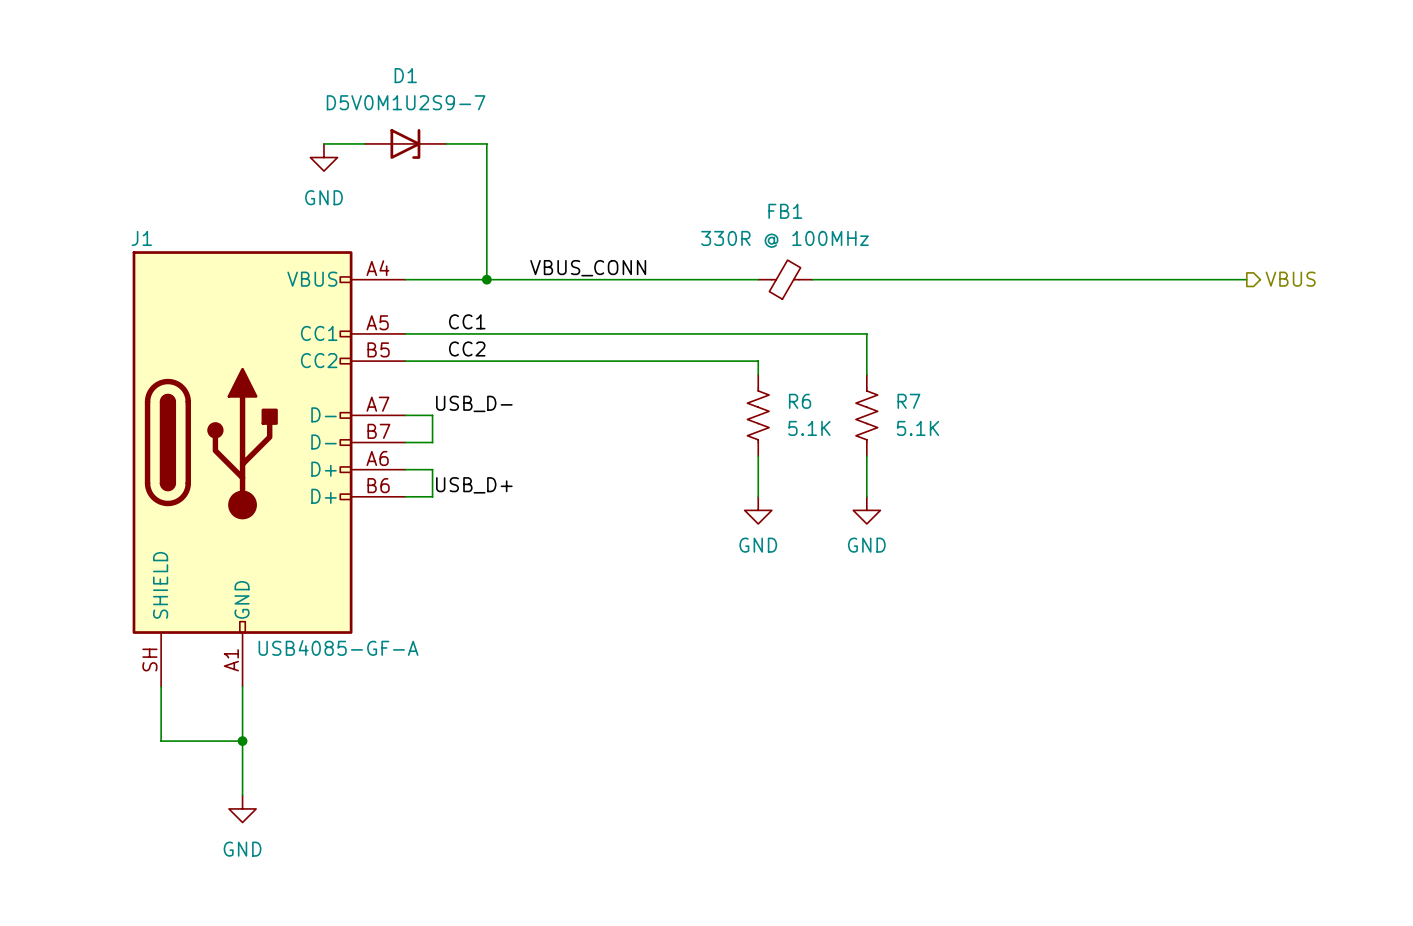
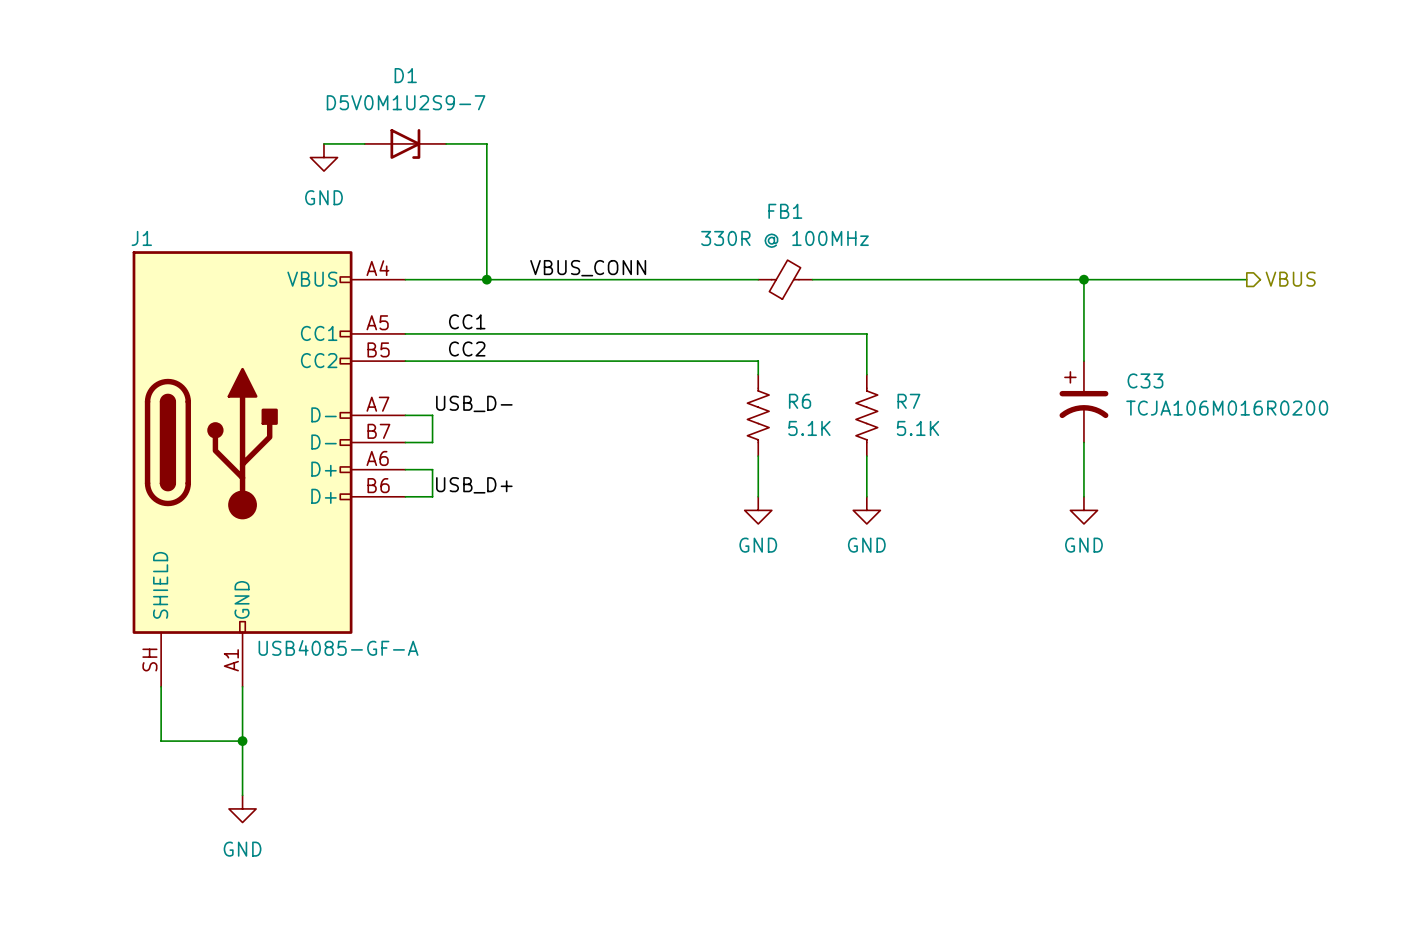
wire: none -> (1083, 279) (1083, 361)
junction: none -> (1083, 279)
C33: none -> TCJA106M016R0200 (1083, 401)
wire: none -> (1083, 442) (1083, 496)
power symbol: none -> GND (1083, 510)

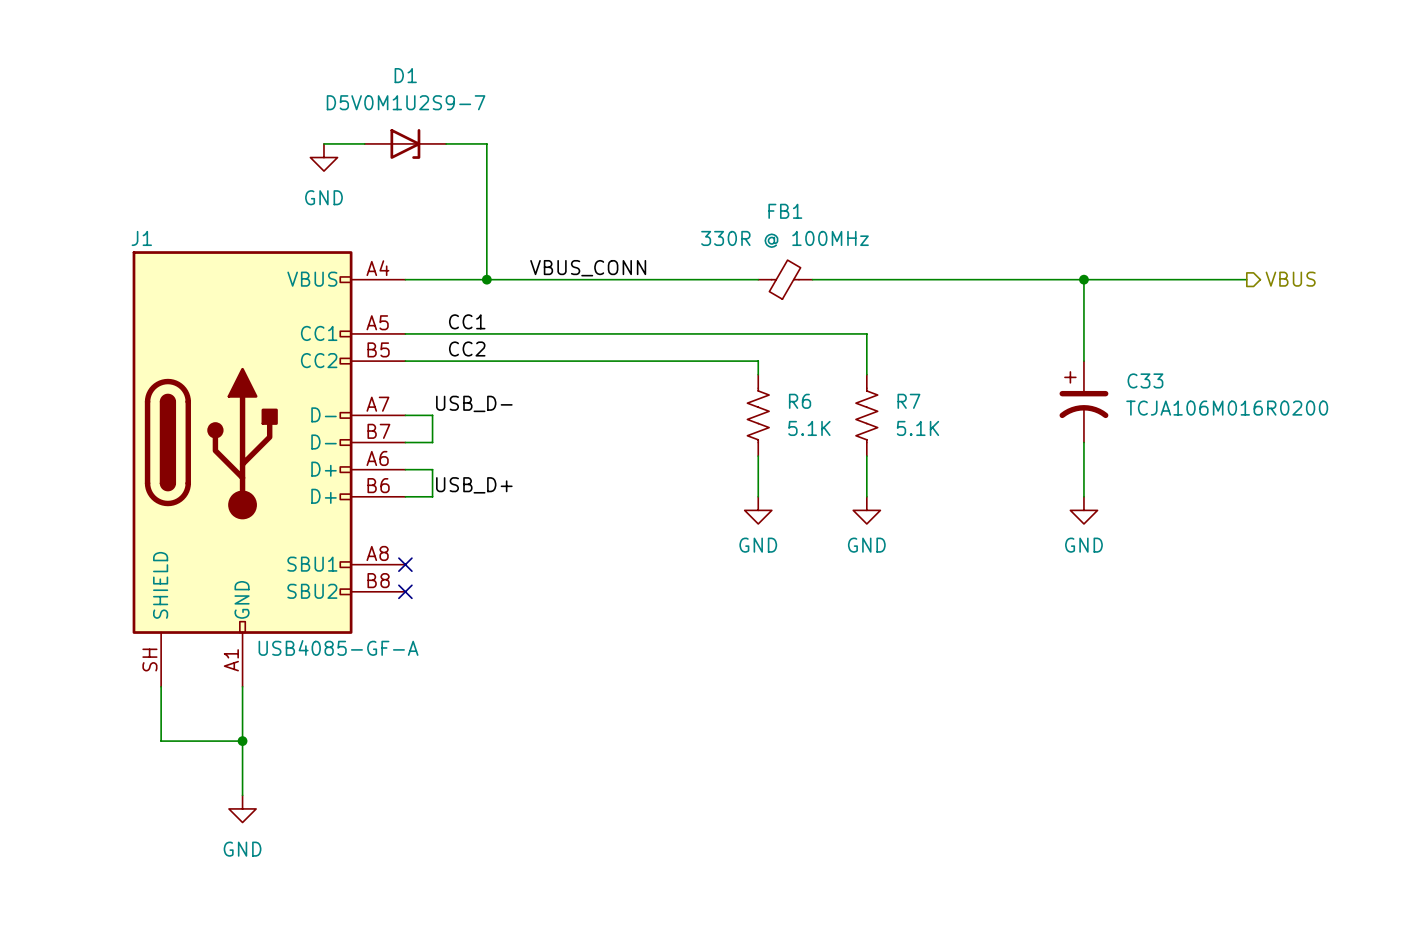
J1 symbol: [132, 251, 406, 687] -> [132, 251, 406, 687]
no-connect mark: none -> (405, 564)
no-connect mark: none -> (405, 591)

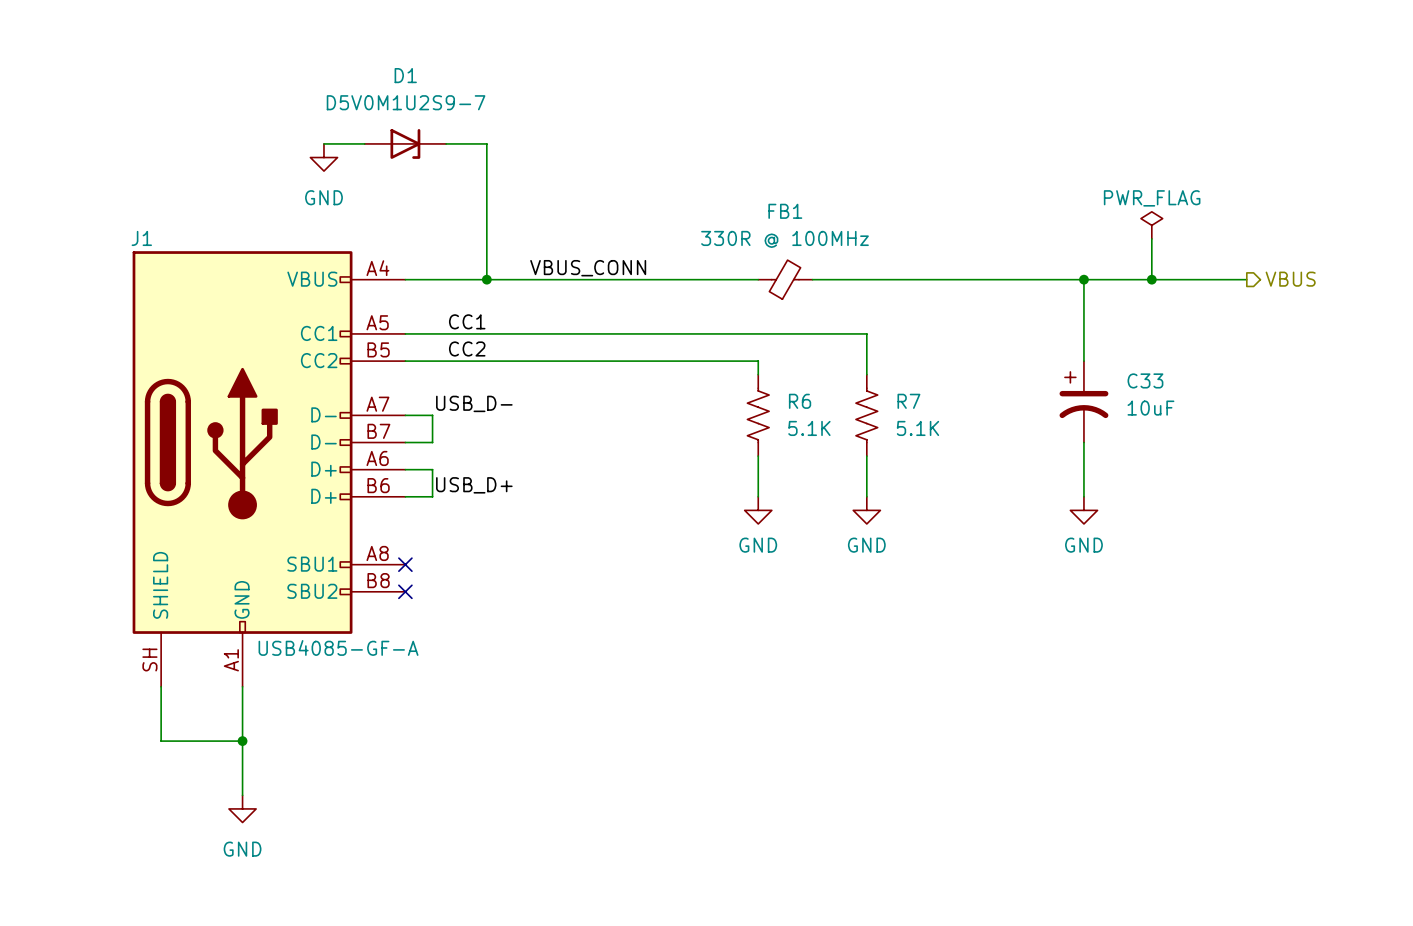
power symbol: none -> PWR_FLAG (1151, 225)
wire: none -> (1151, 238) (1151, 279)
junction: none -> (1151, 279)
C33 value: TCJA106M016R0200 (1227, 408) -> 10uF (1150, 408)

